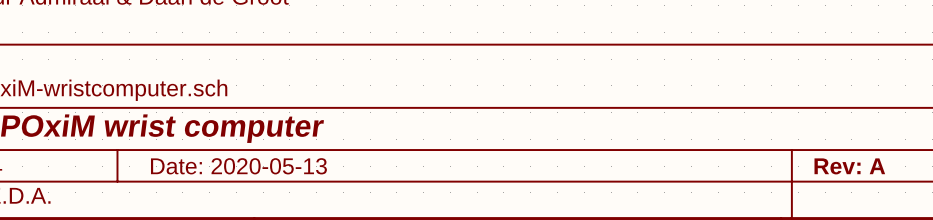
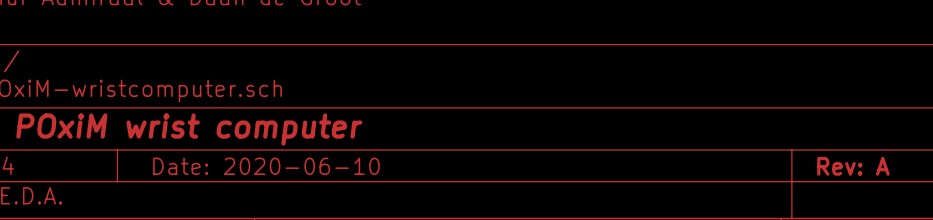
title block: Date: 2020-05-13 (238, 166) -> Date: 2020-06-10 (266, 166)

